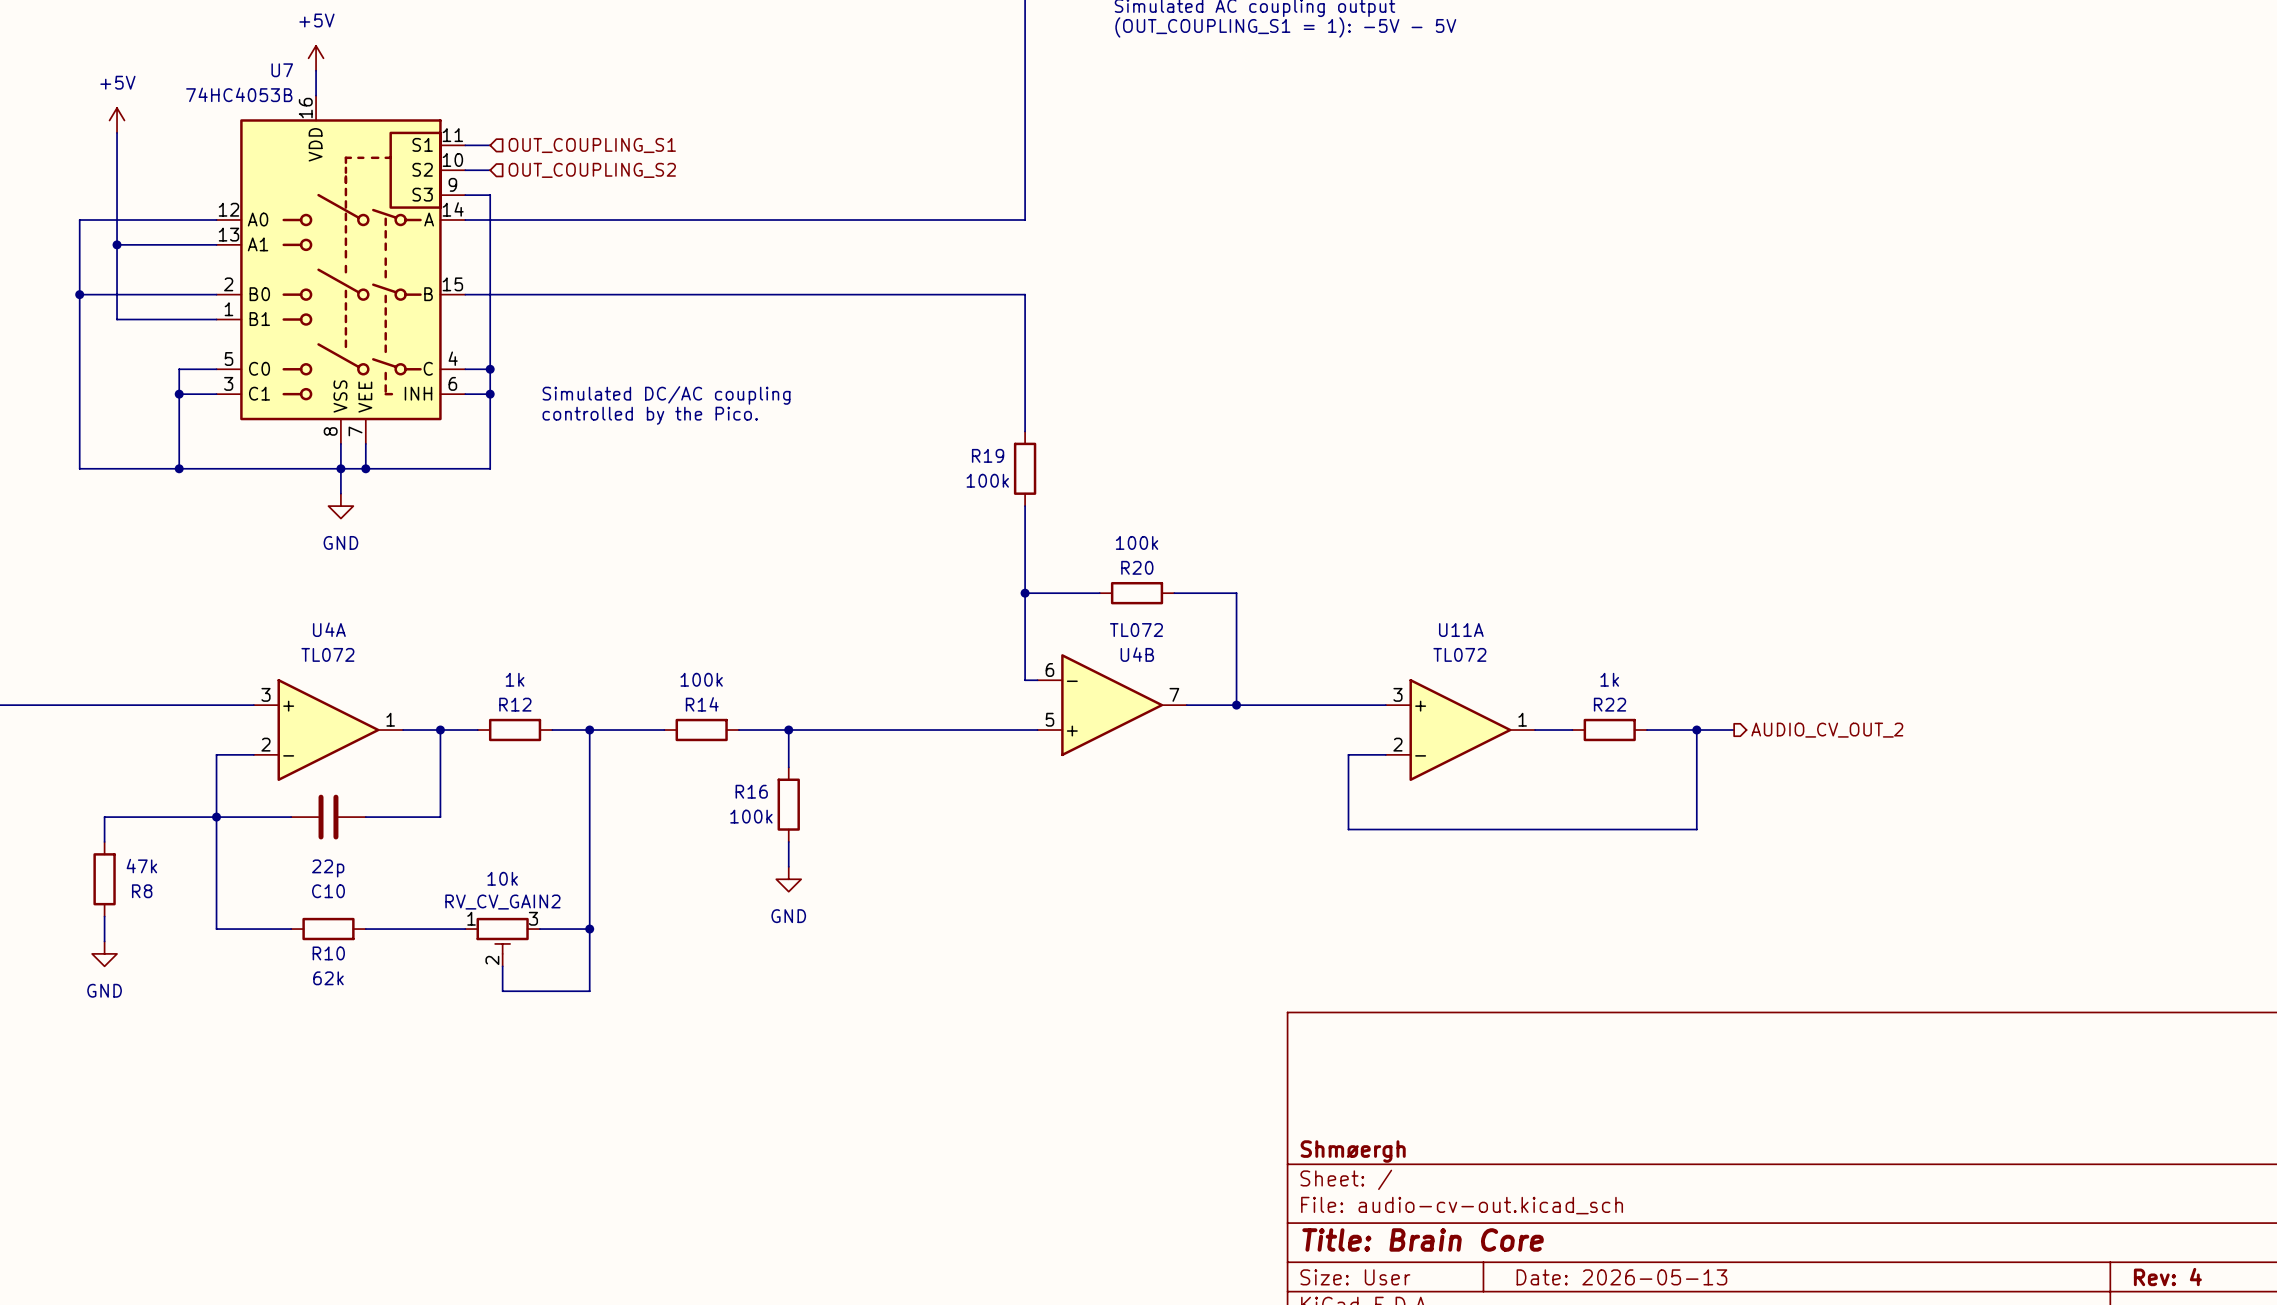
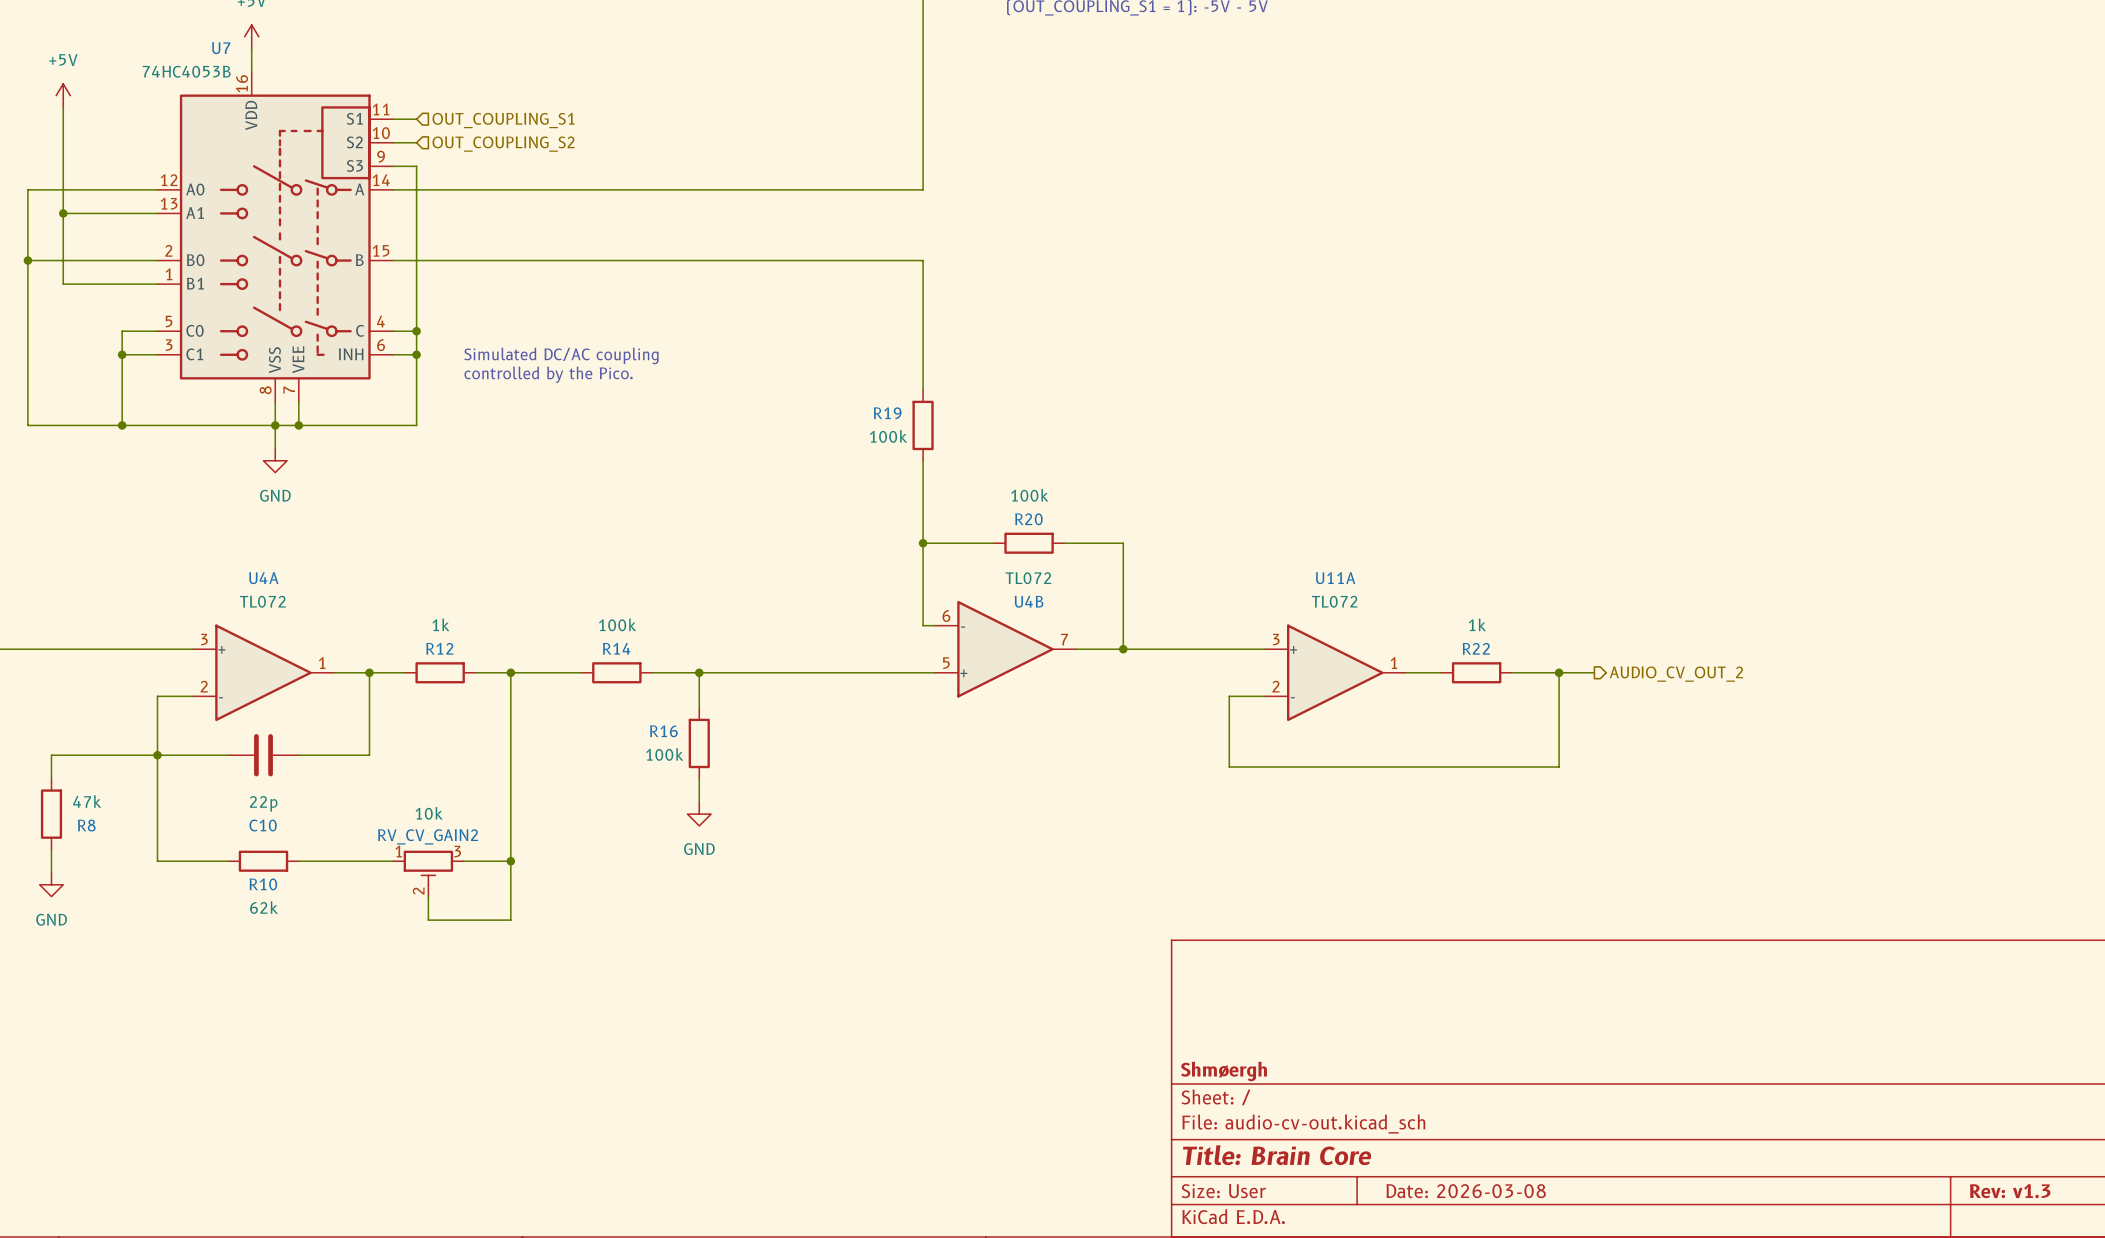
title block: Date: 2026-05-13 (1621, 1277) -> Date: 2026-03-08 (1466, 1191)
title block: Rev: 4 (2167, 1277) -> Rev: v1.3 (2010, 1191)

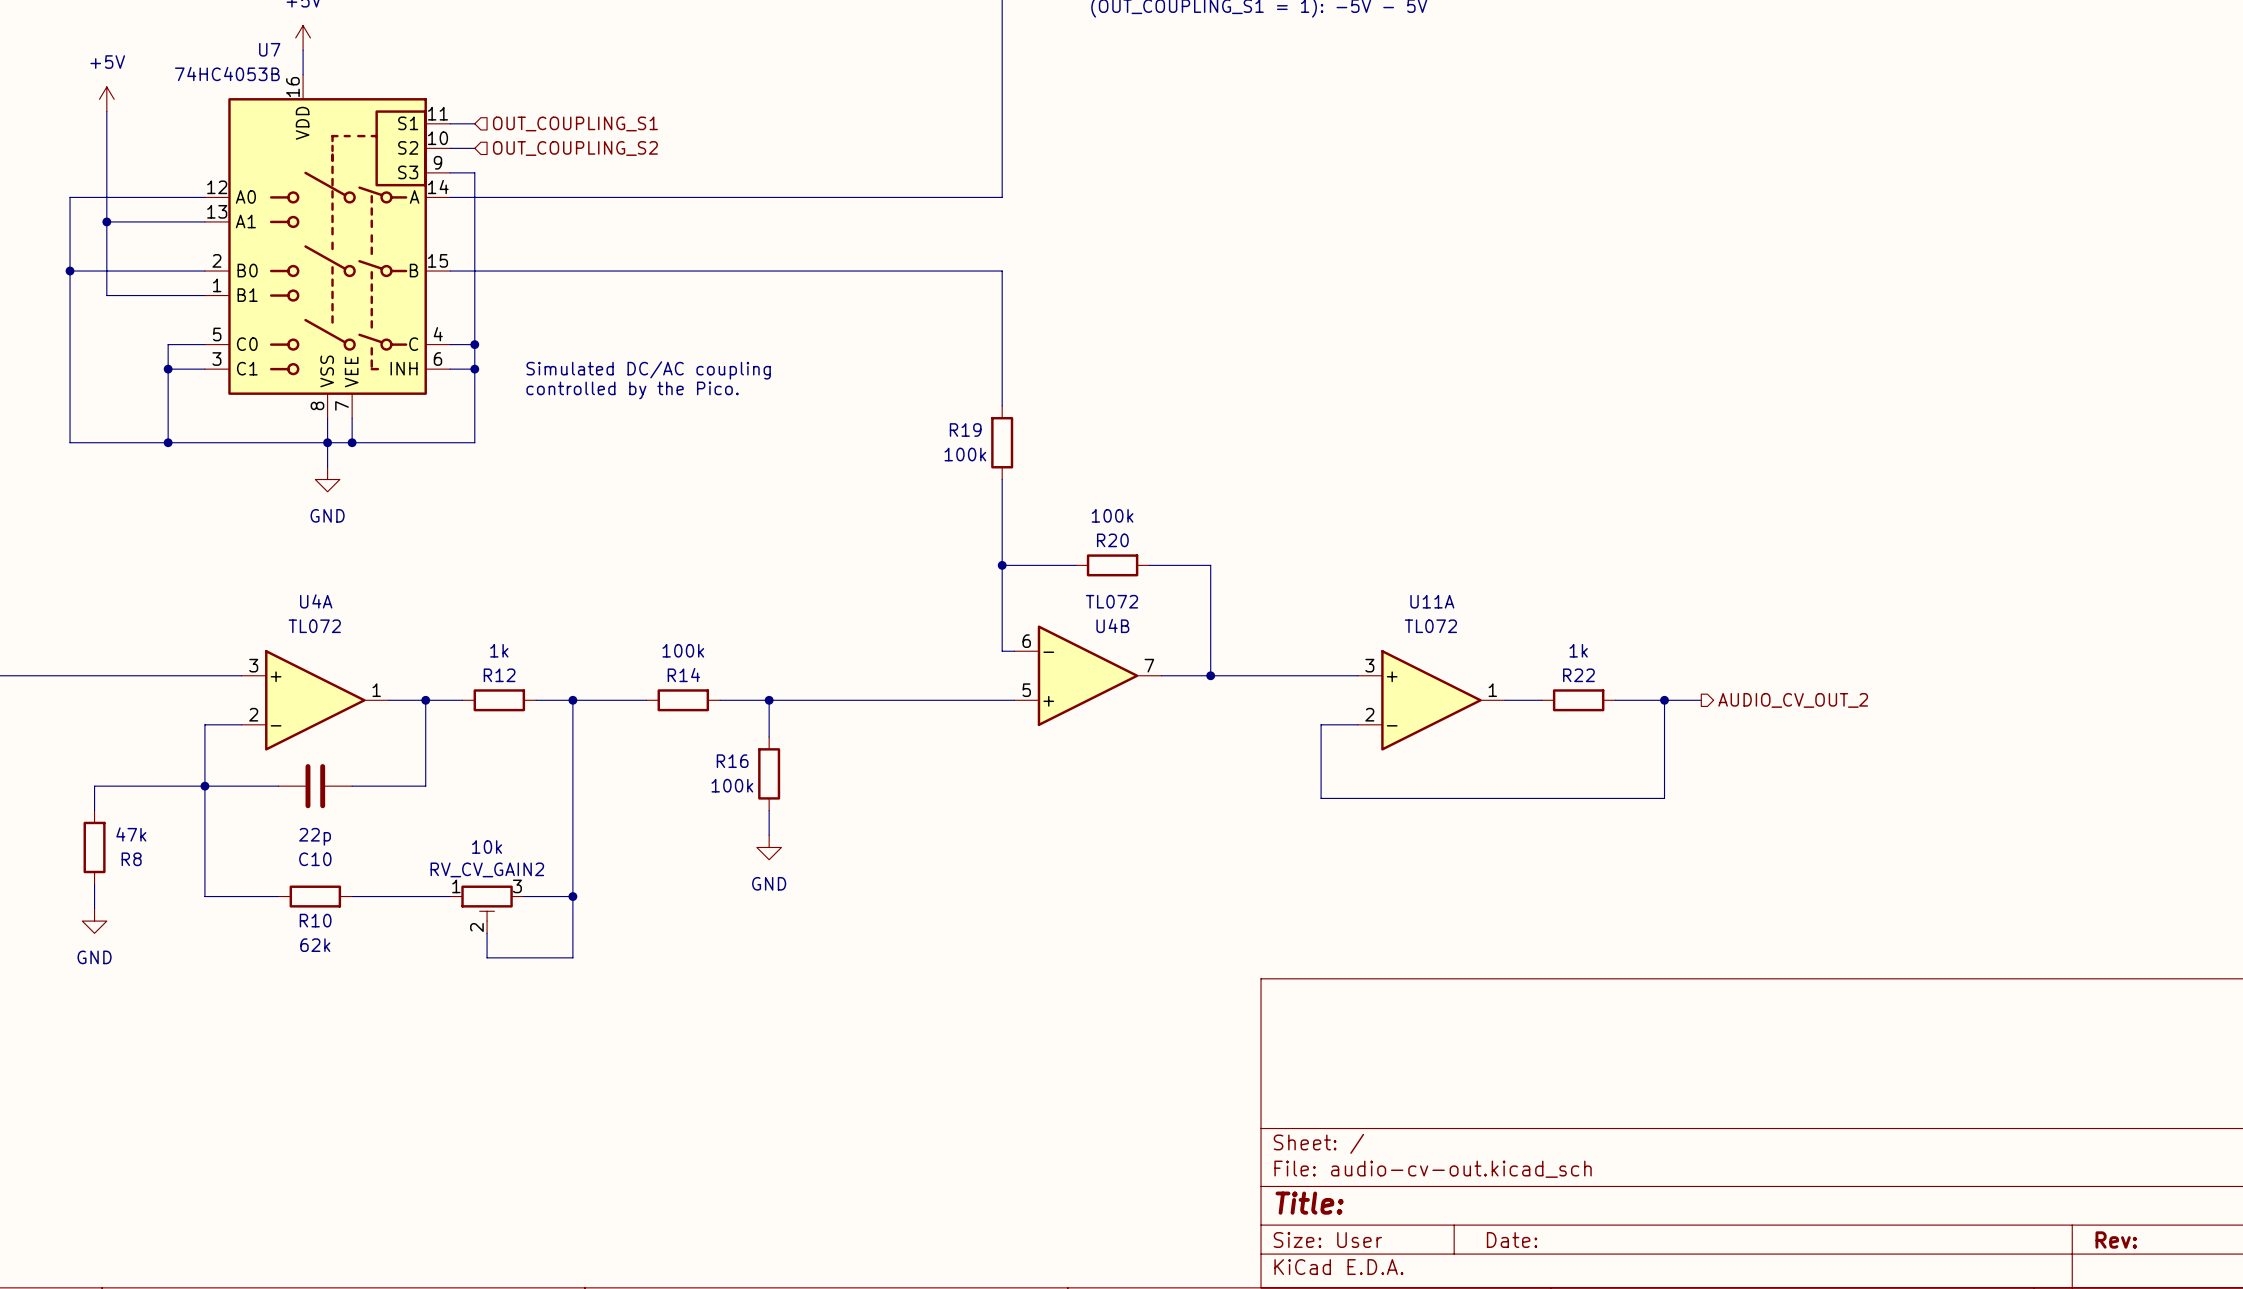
title block: Shmøergh (1224, 1071) -> none
title block: Title: Brain Core (1277, 1155) -> Title: (1309, 1203)
title block: Date: 2026-03-08 (1466, 1191) -> Date: (1512, 1240)
title block: Rev: v1.3 (2010, 1191) -> Rev: (2116, 1240)

